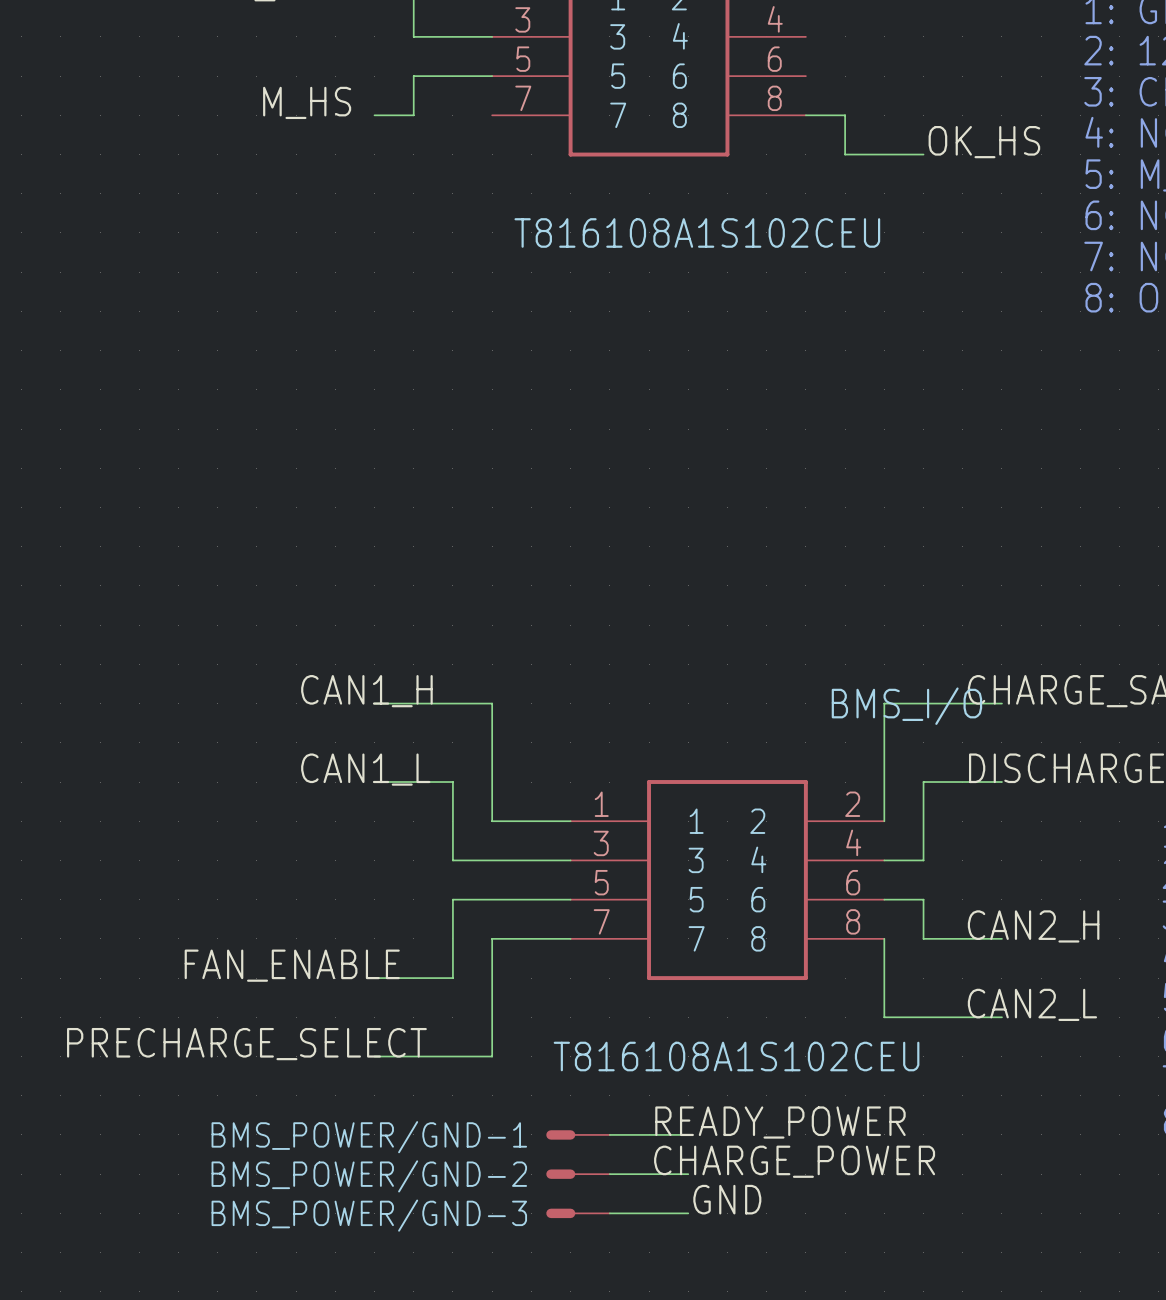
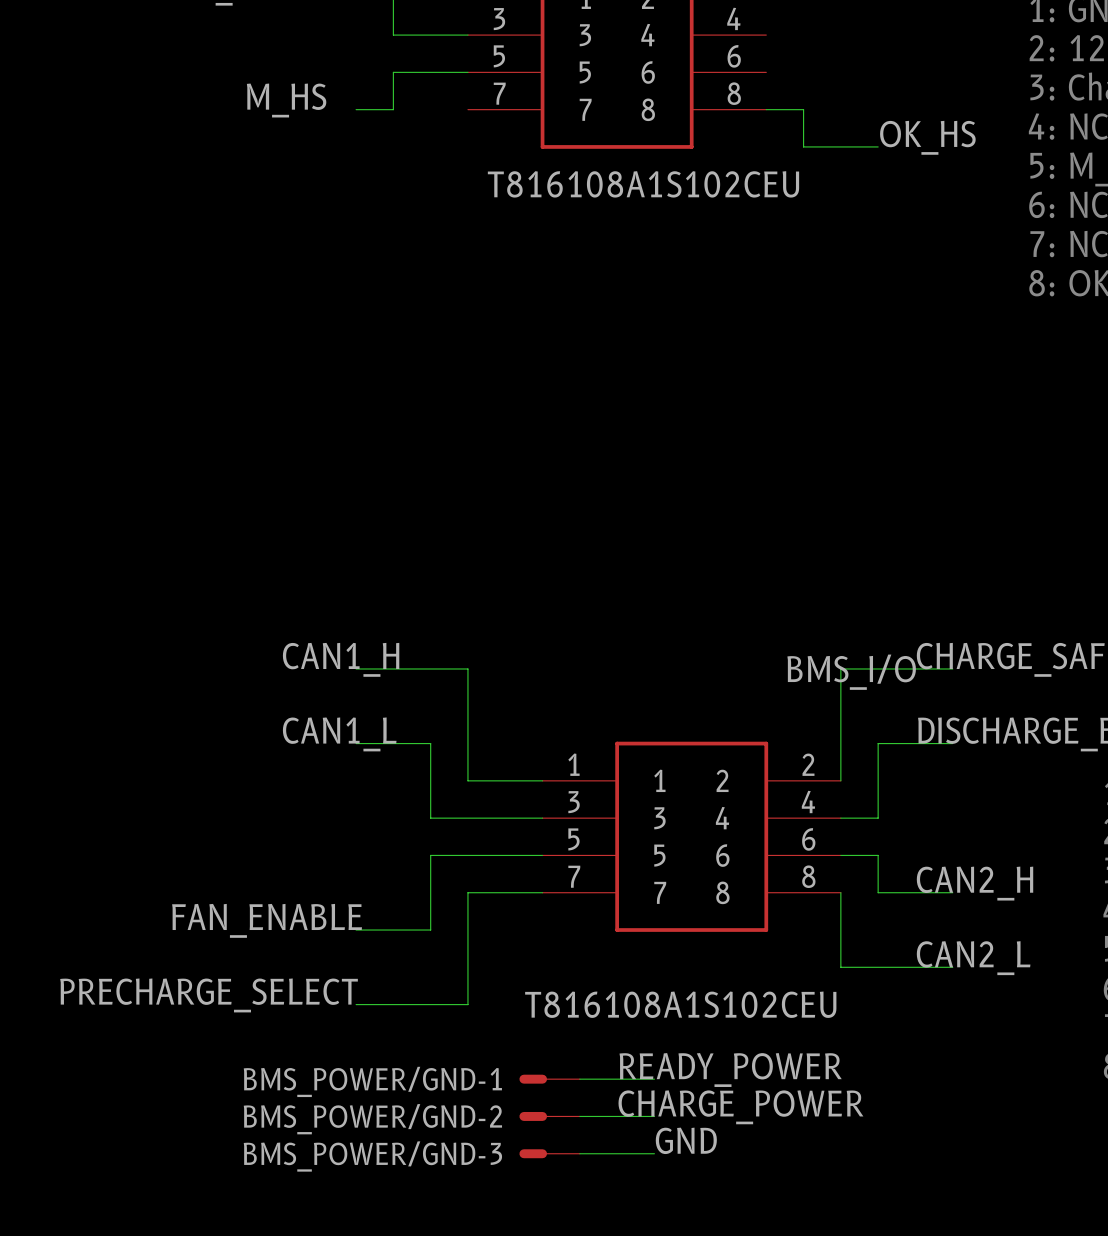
part value position: T816108A1S102CEU (697, 232) -> T816108A1S102CEU (643, 184)

